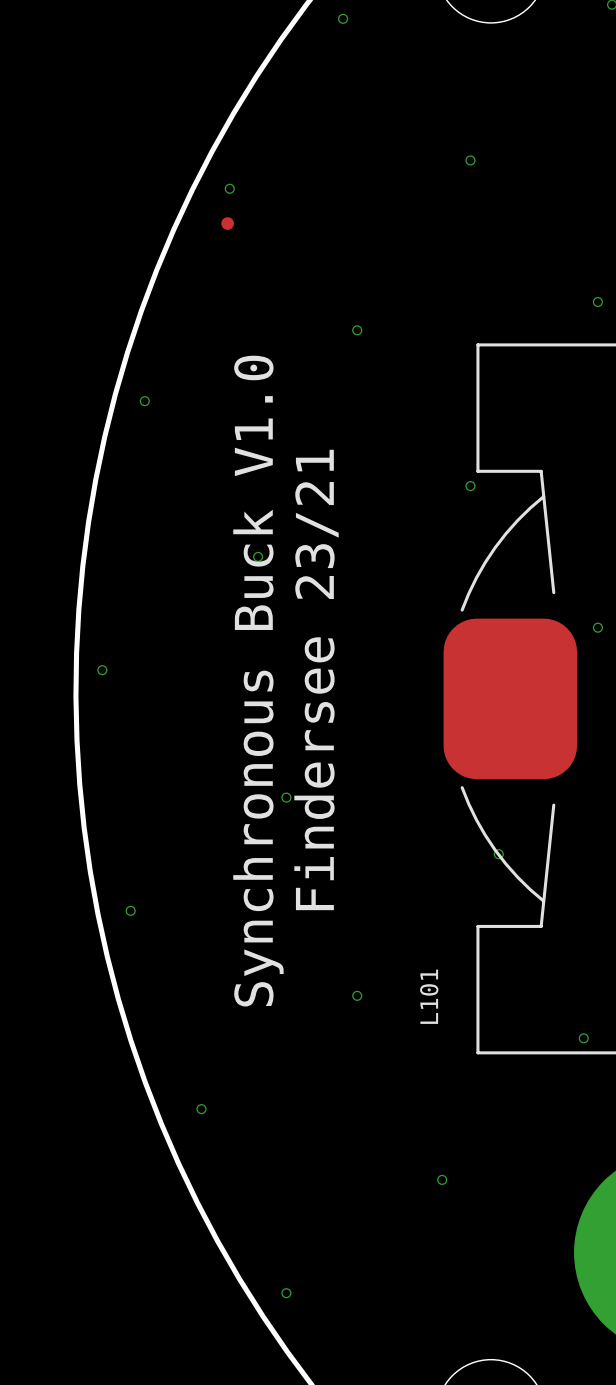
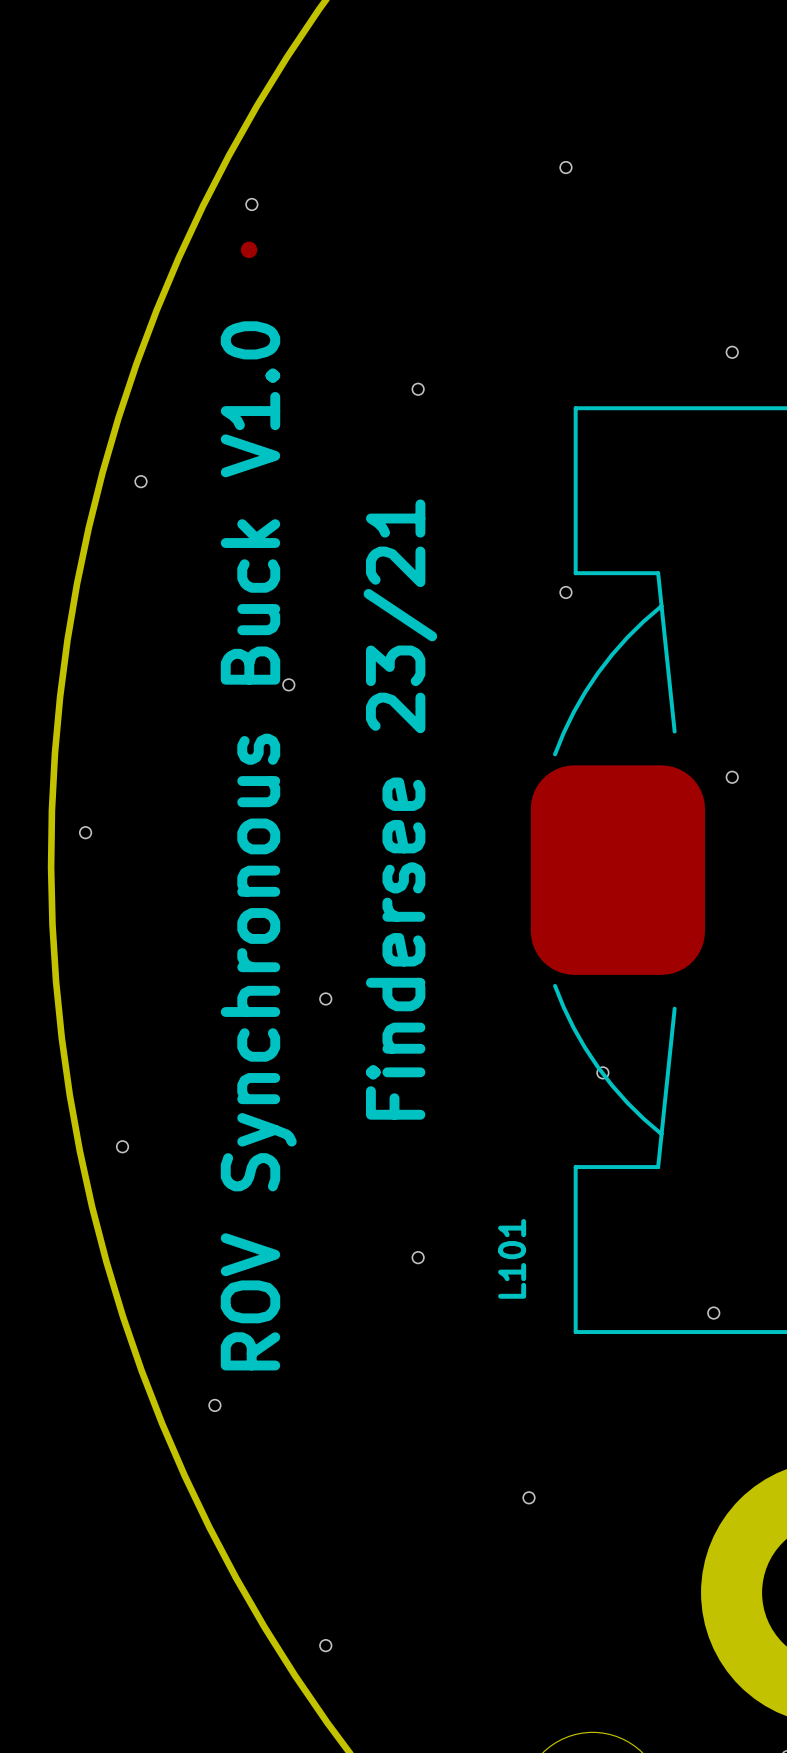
text position: Findersee 23/21 (316, 679) -> Findersee 23/21 (400, 809)
text: Synchronous Buck V1.0 (258, 681) -> ROV Synchronous Buck V1.0 (258, 845)

